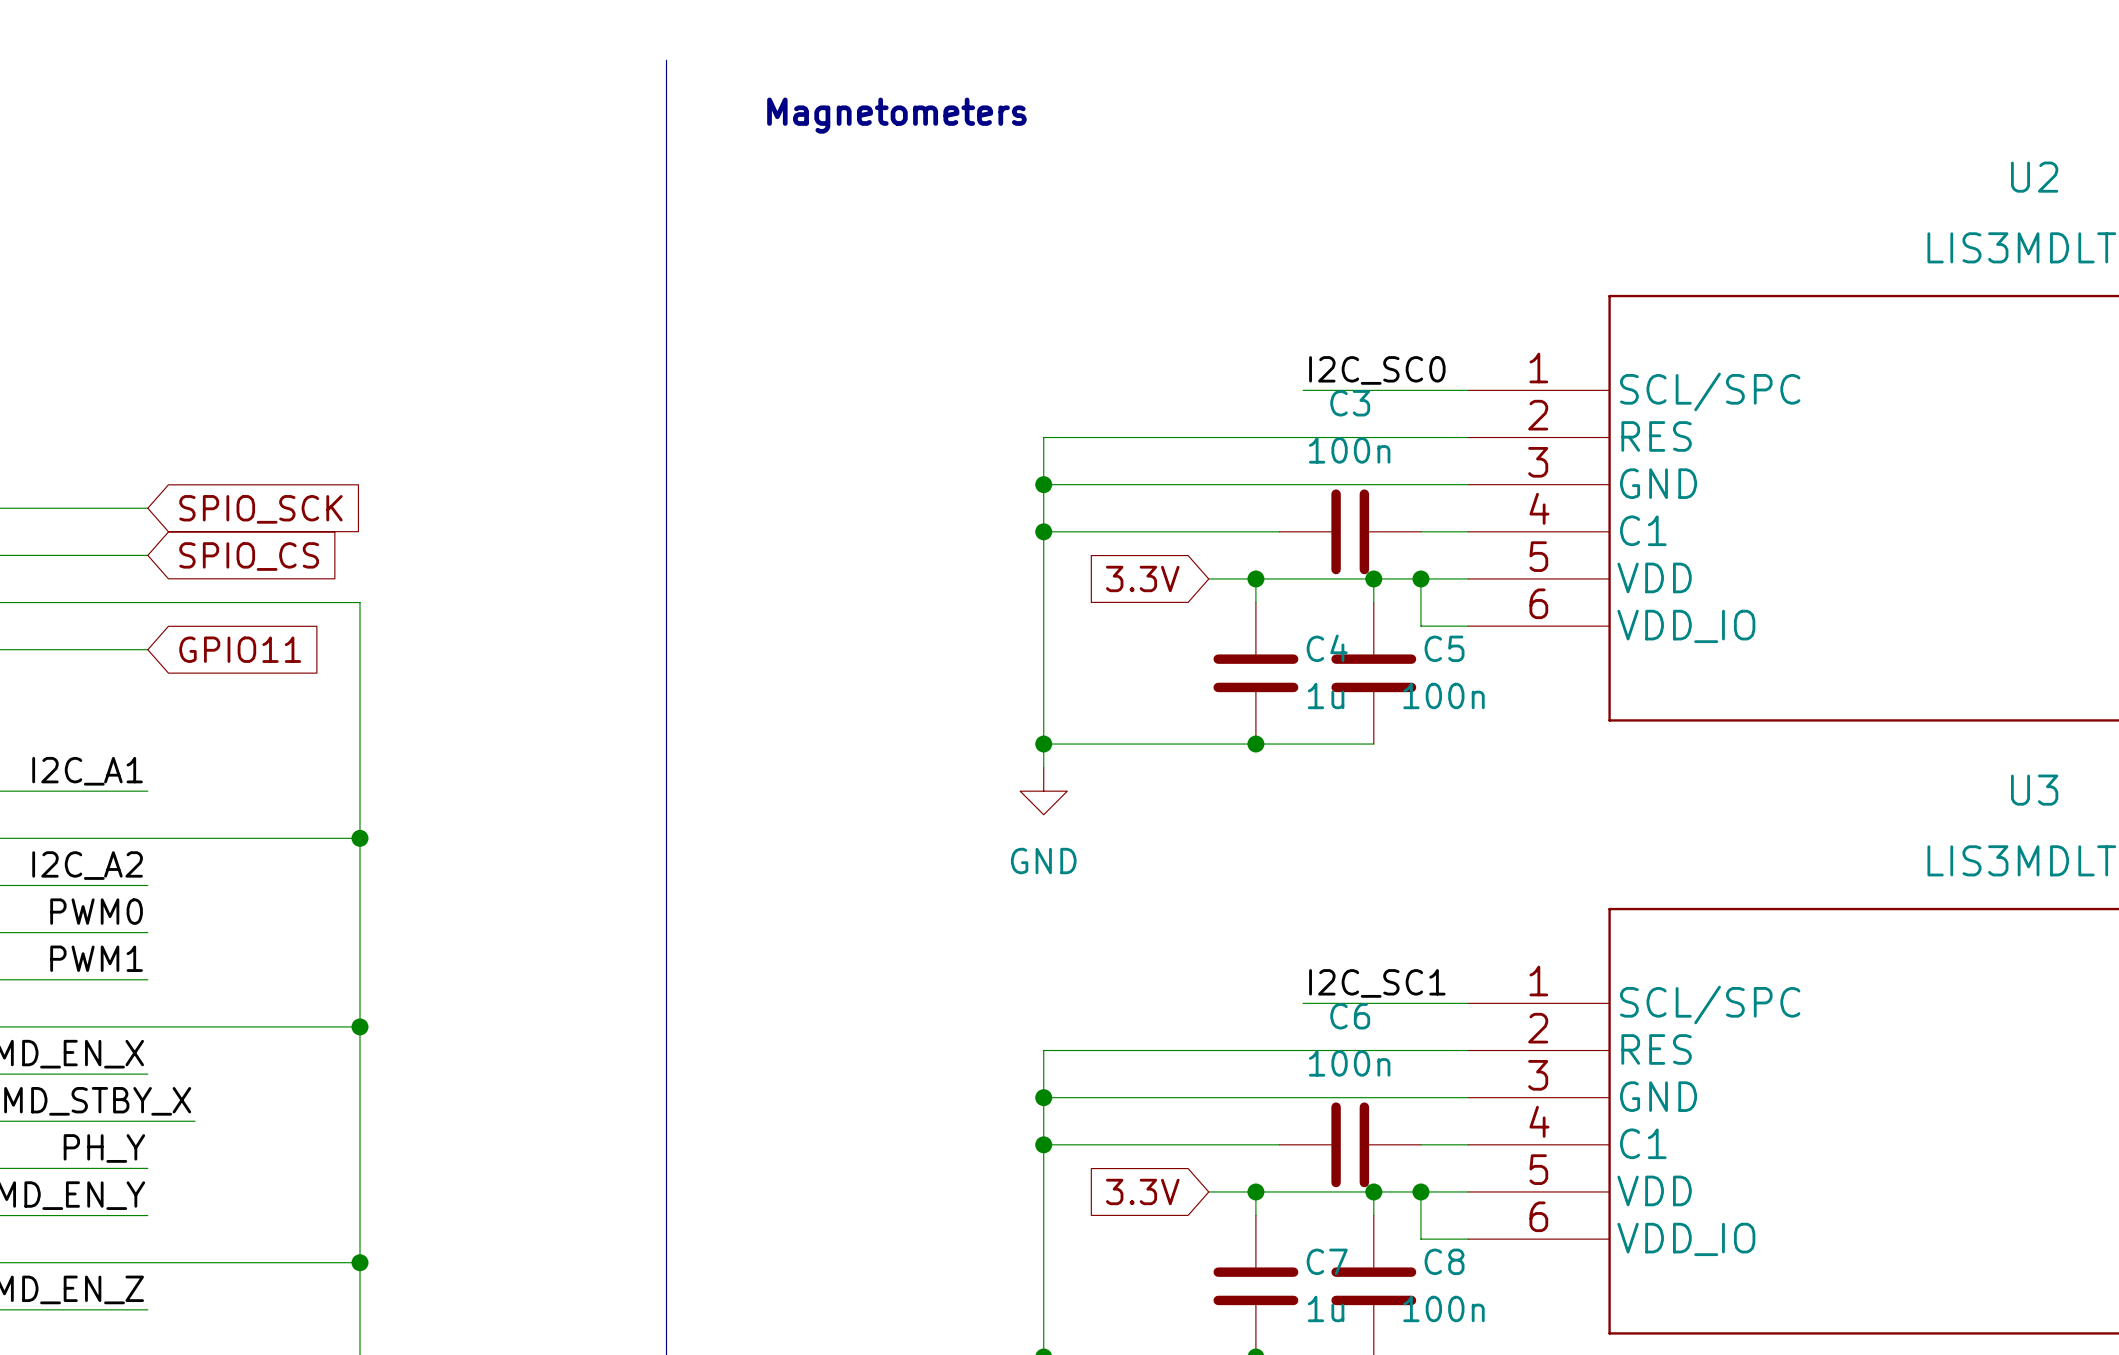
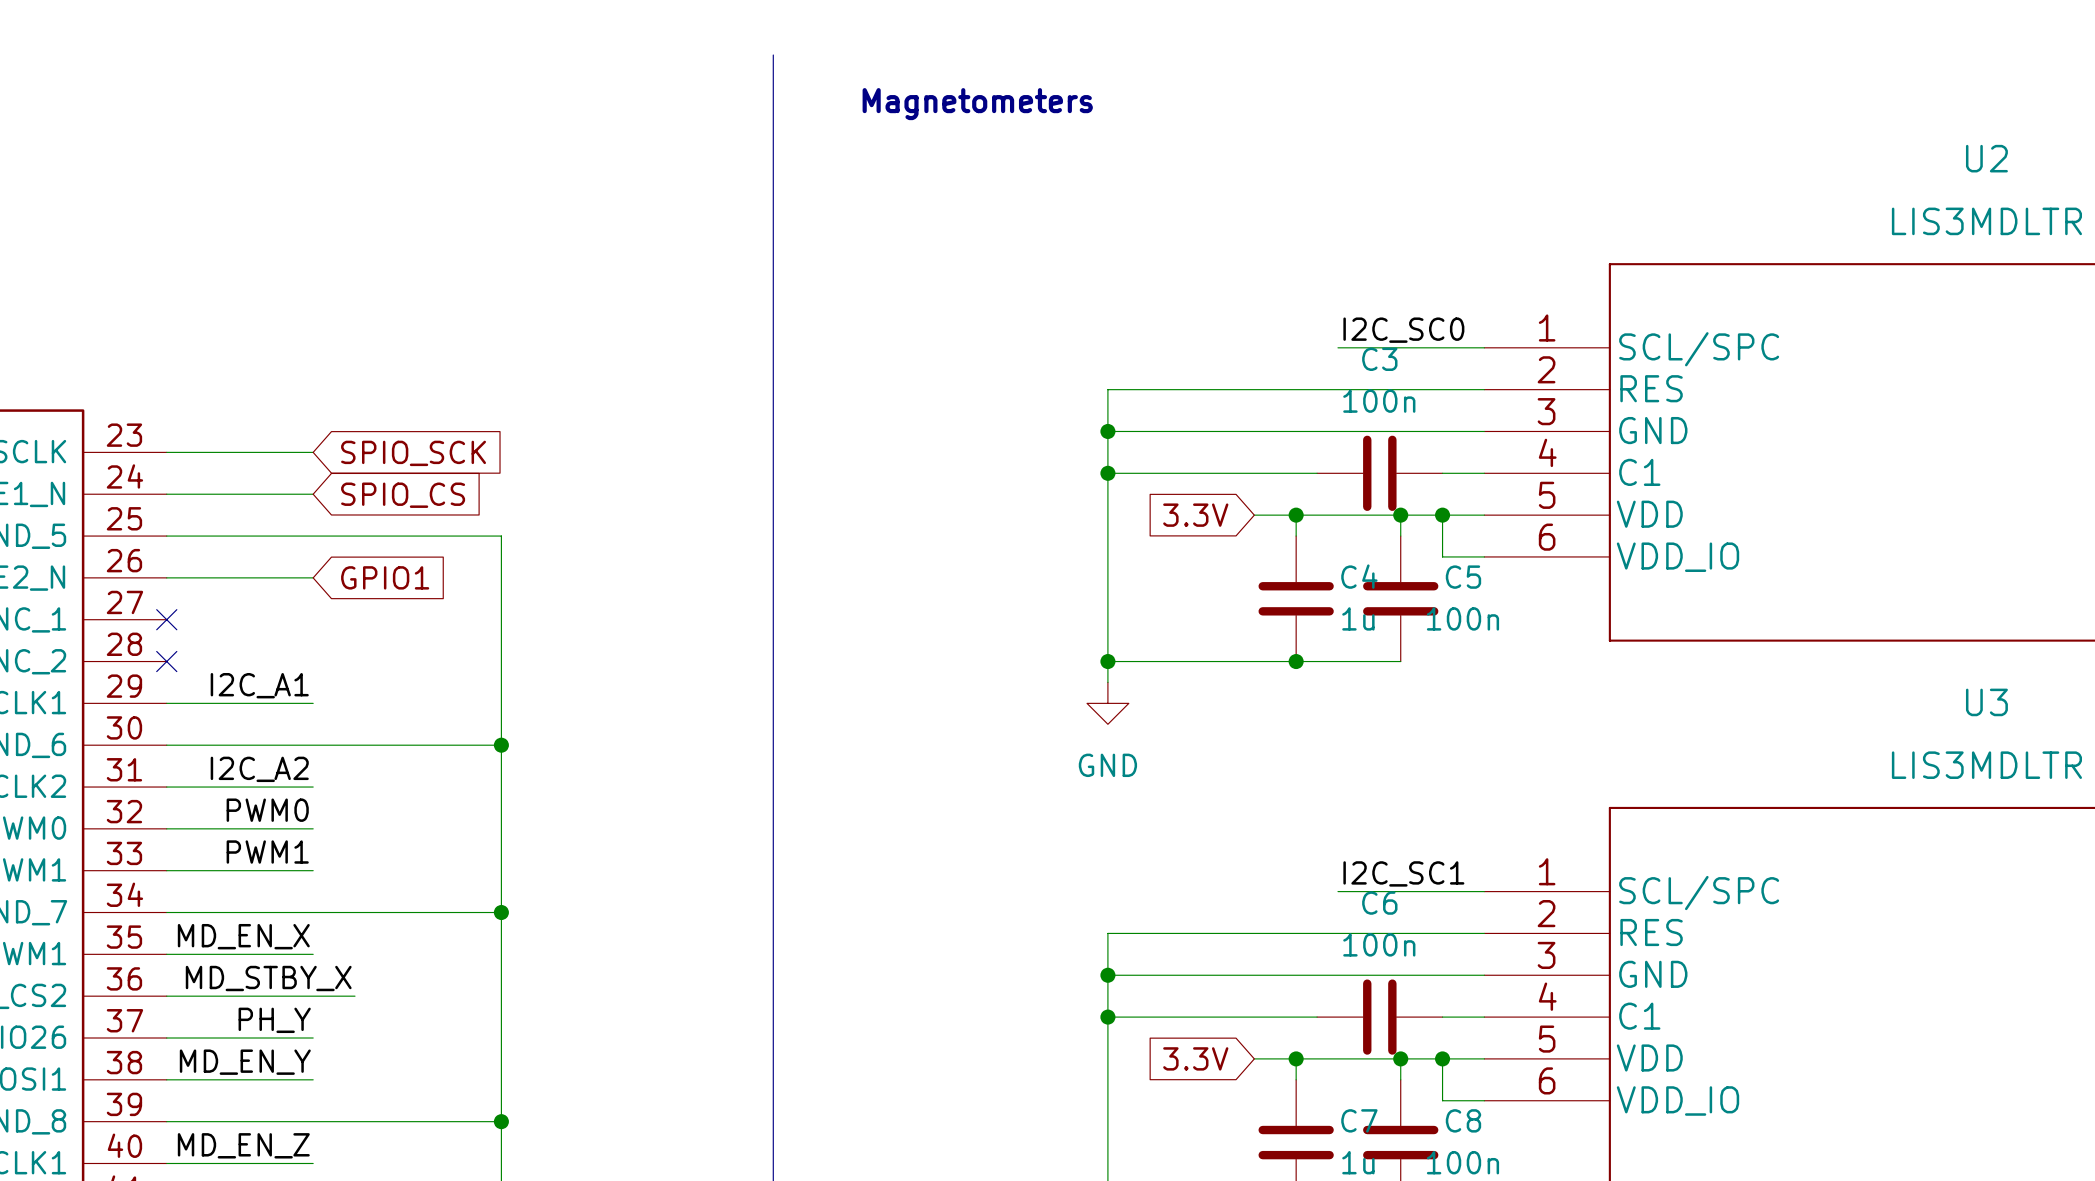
global label: GPIO11 (240, 649) -> GPIO1 (385, 577)

